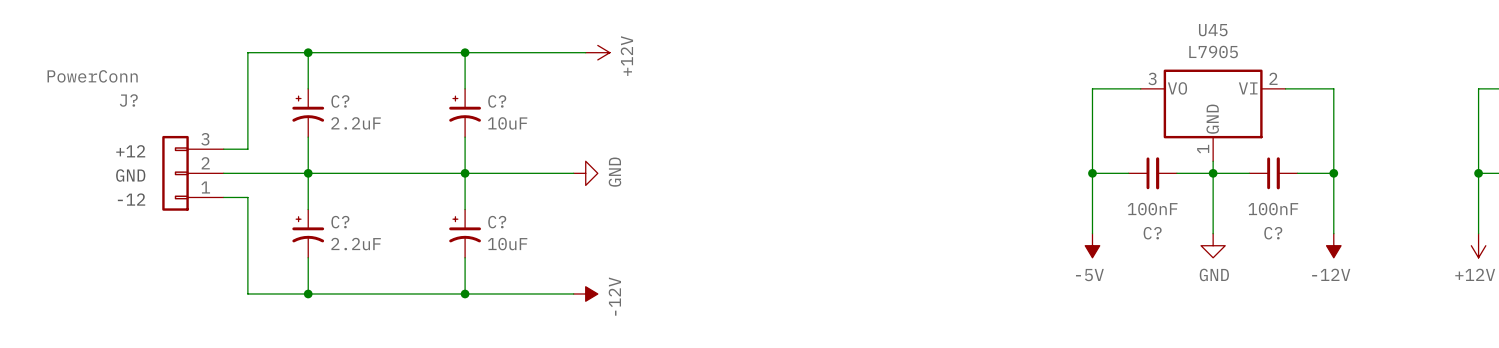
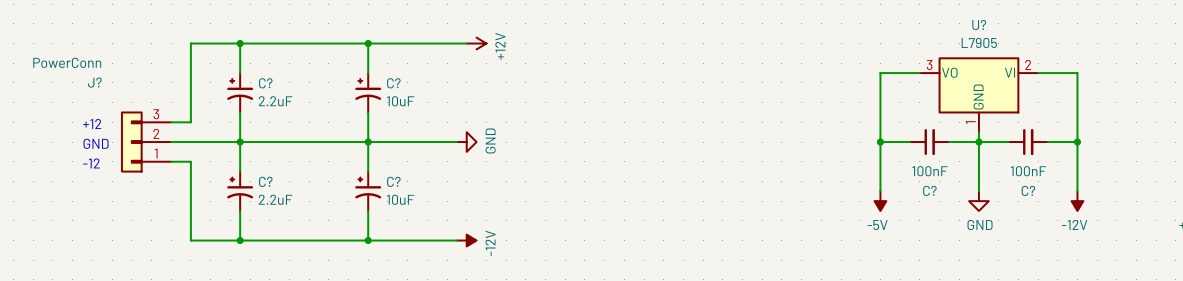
U45 name: U45 (1213, 30) -> U? (979, 25)

